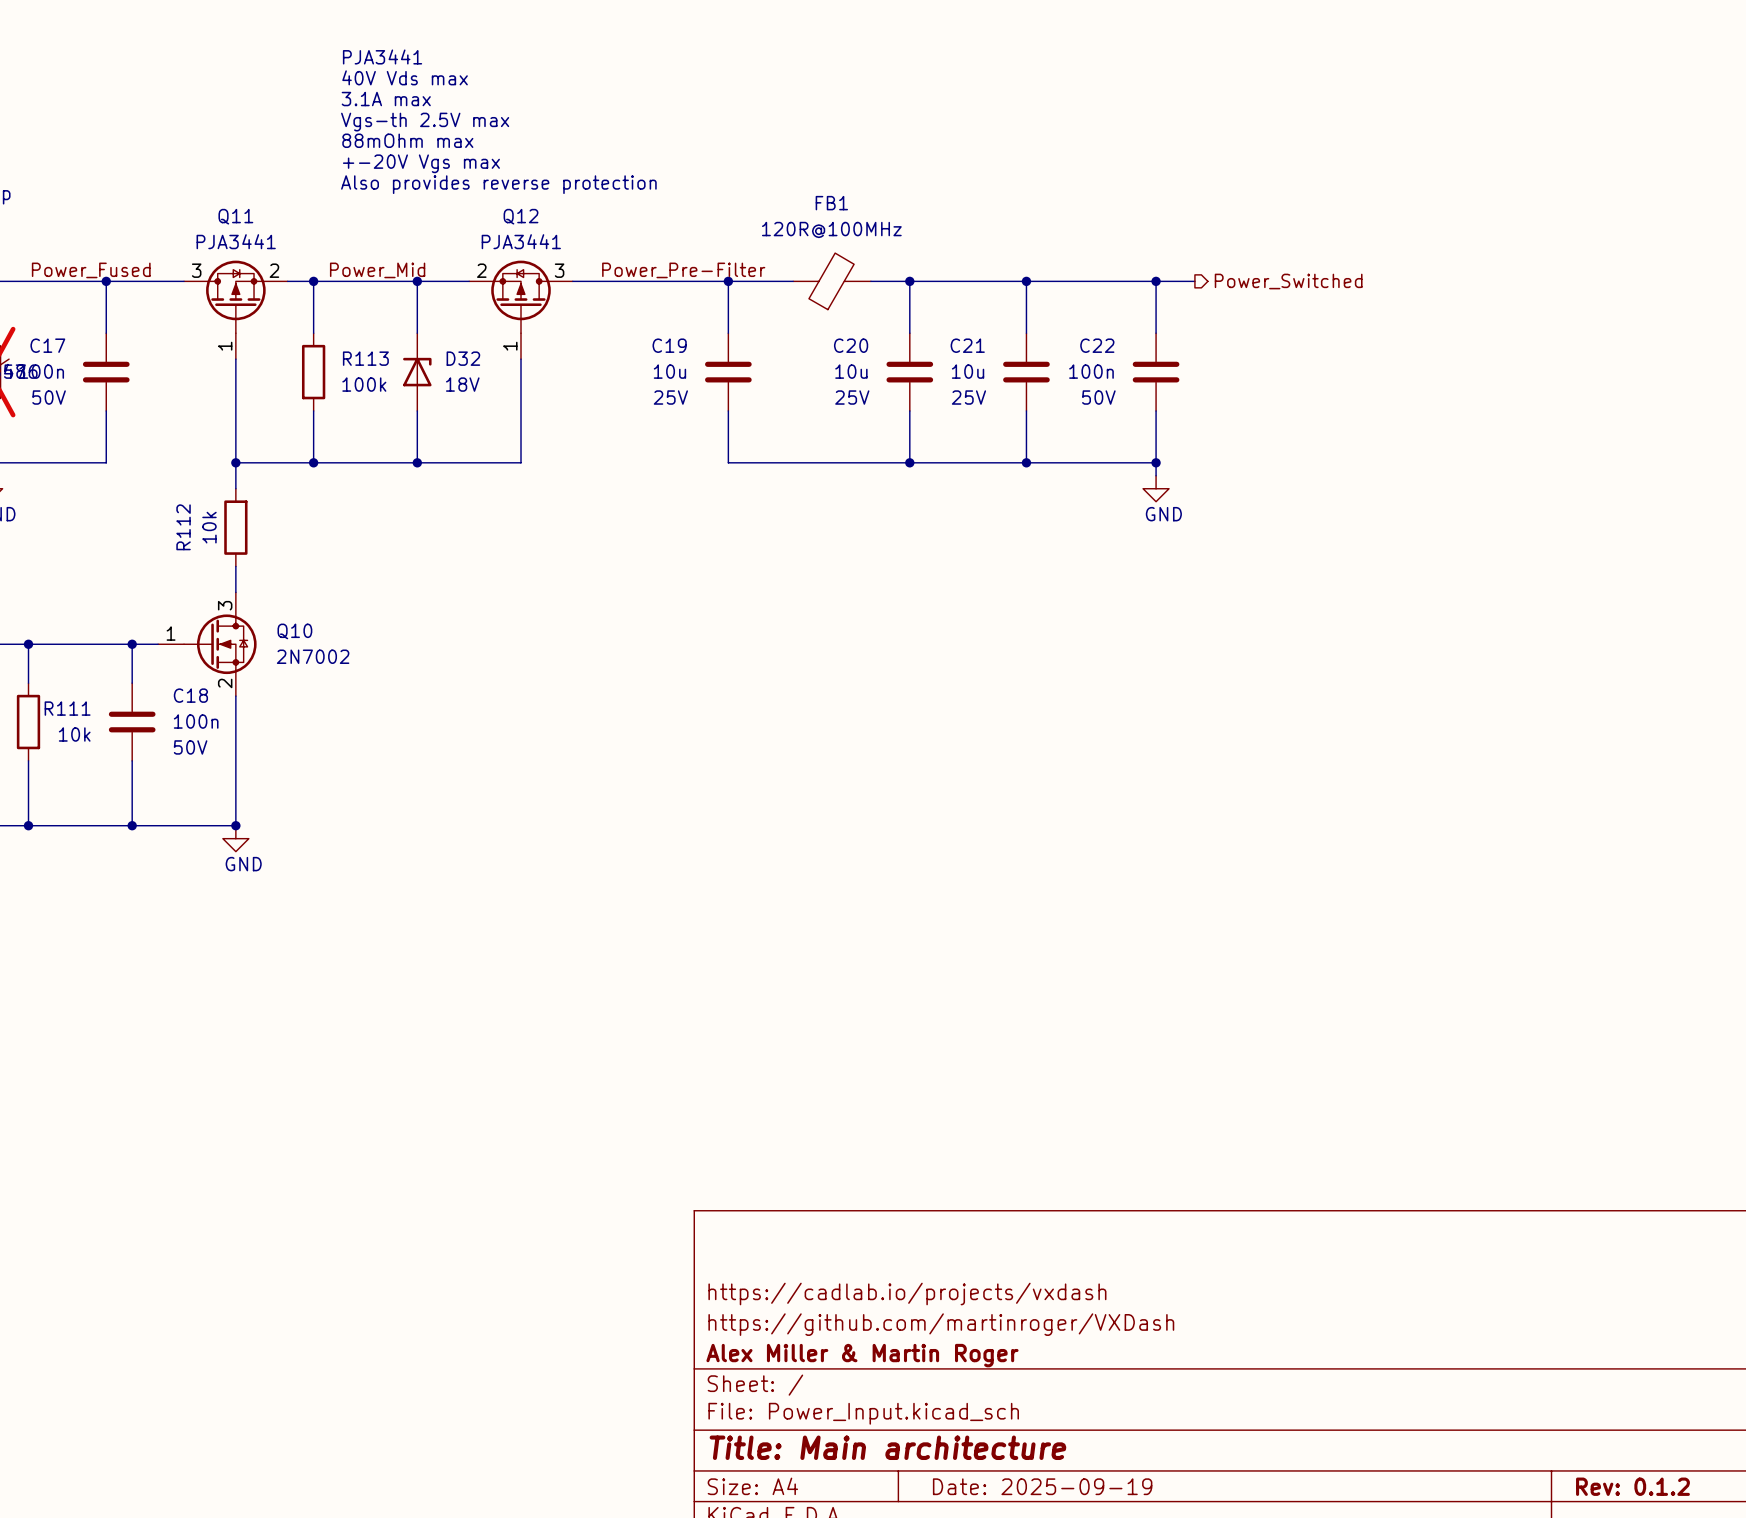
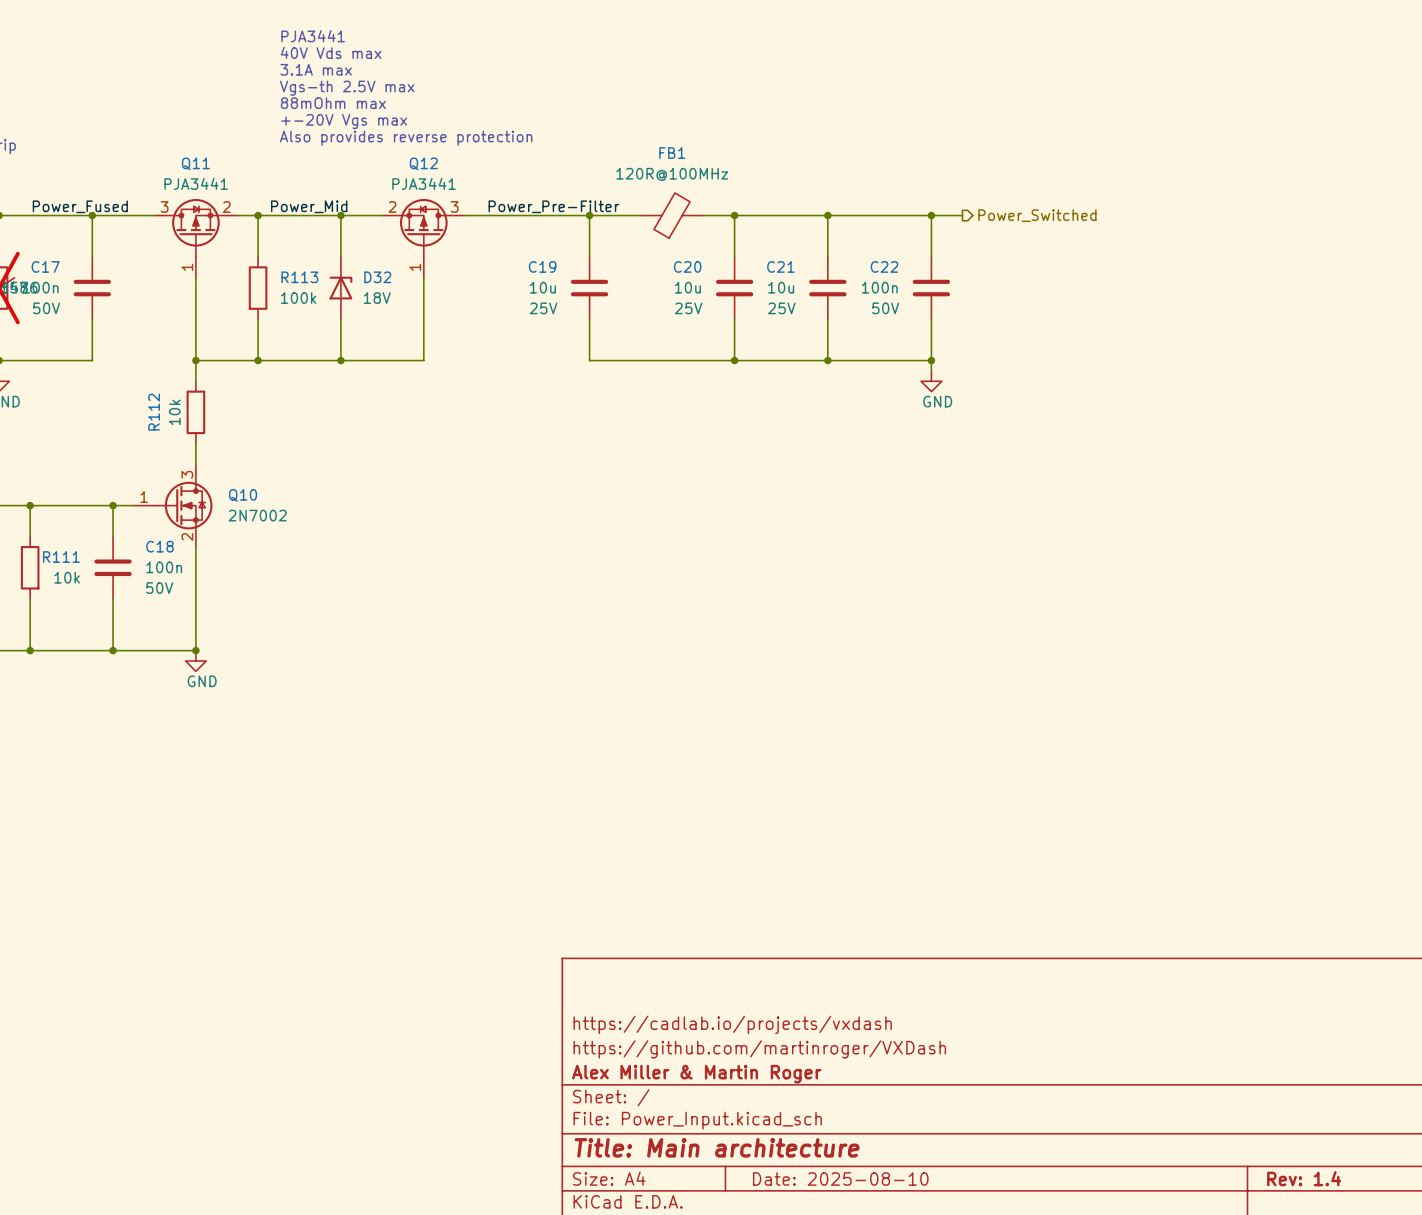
title block: Date: 2025-09-19 (1042, 1486) -> Date: 2025-08-10 (840, 1178)
title block: Rev: 0.1.2 (1632, 1486) -> Rev: 1.4 (1304, 1178)

